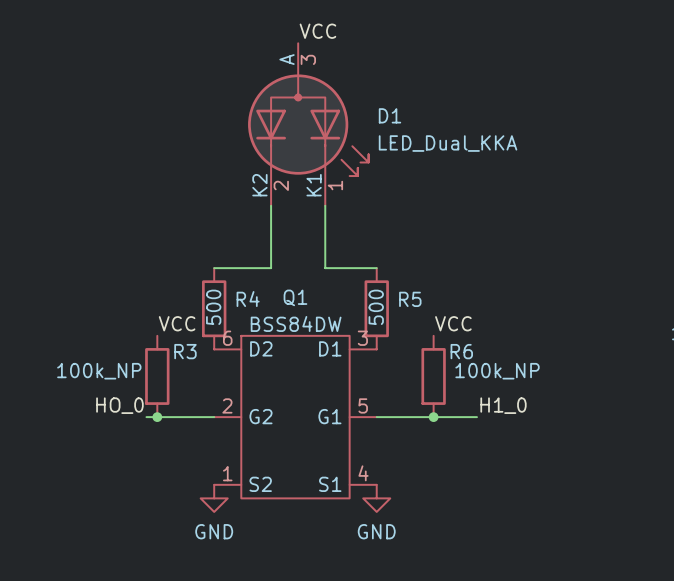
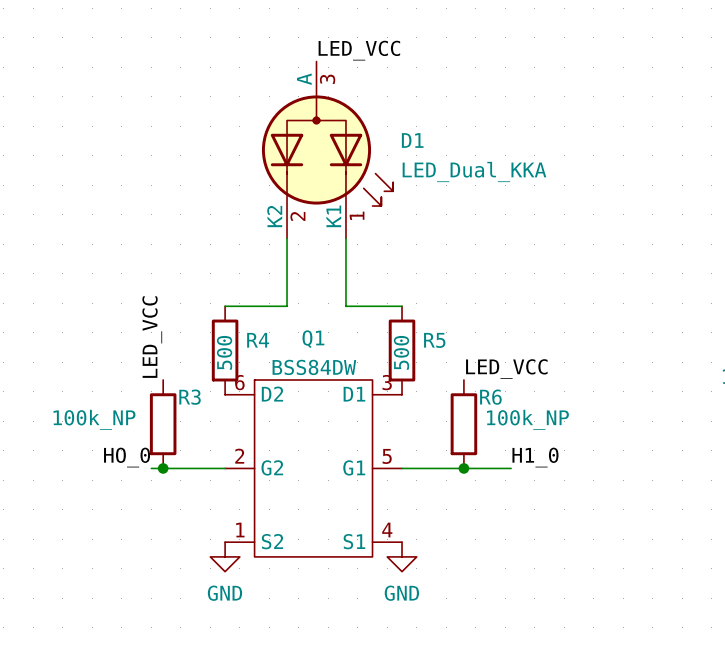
label: VCC (317, 31) -> LED_VCC (359, 50)
label: VCC (177, 323) -> LED_VCC (152, 337)
label: VCC (453, 323) -> LED_VCC (506, 369)

